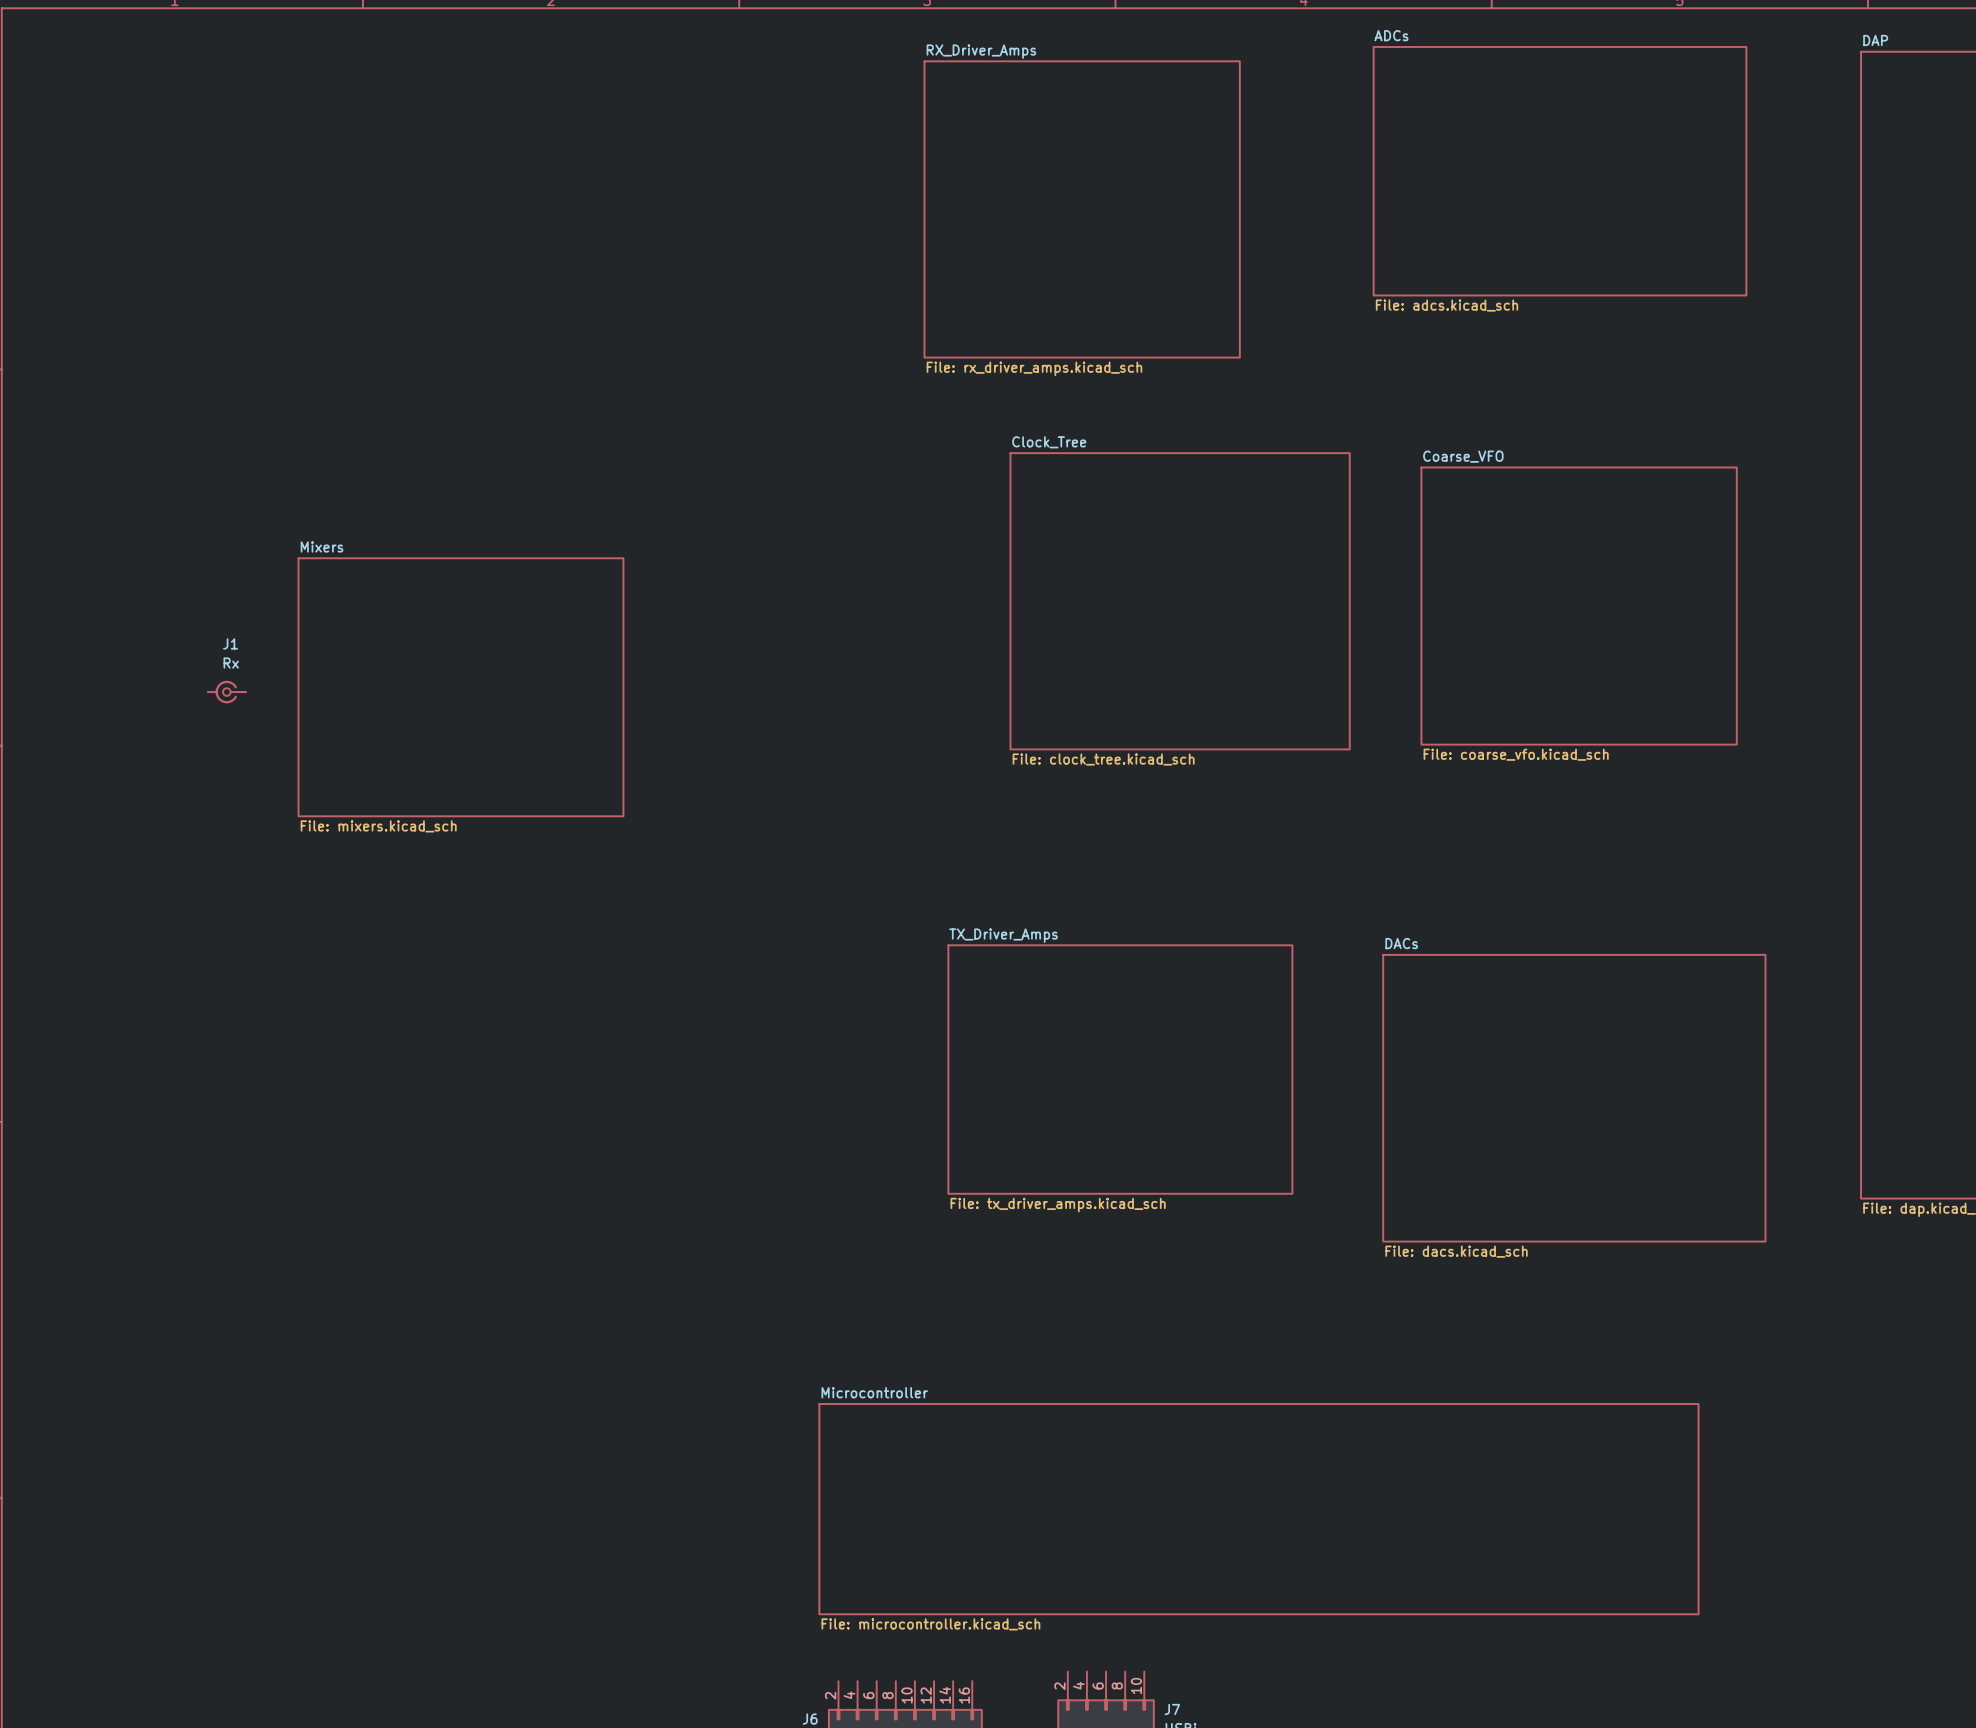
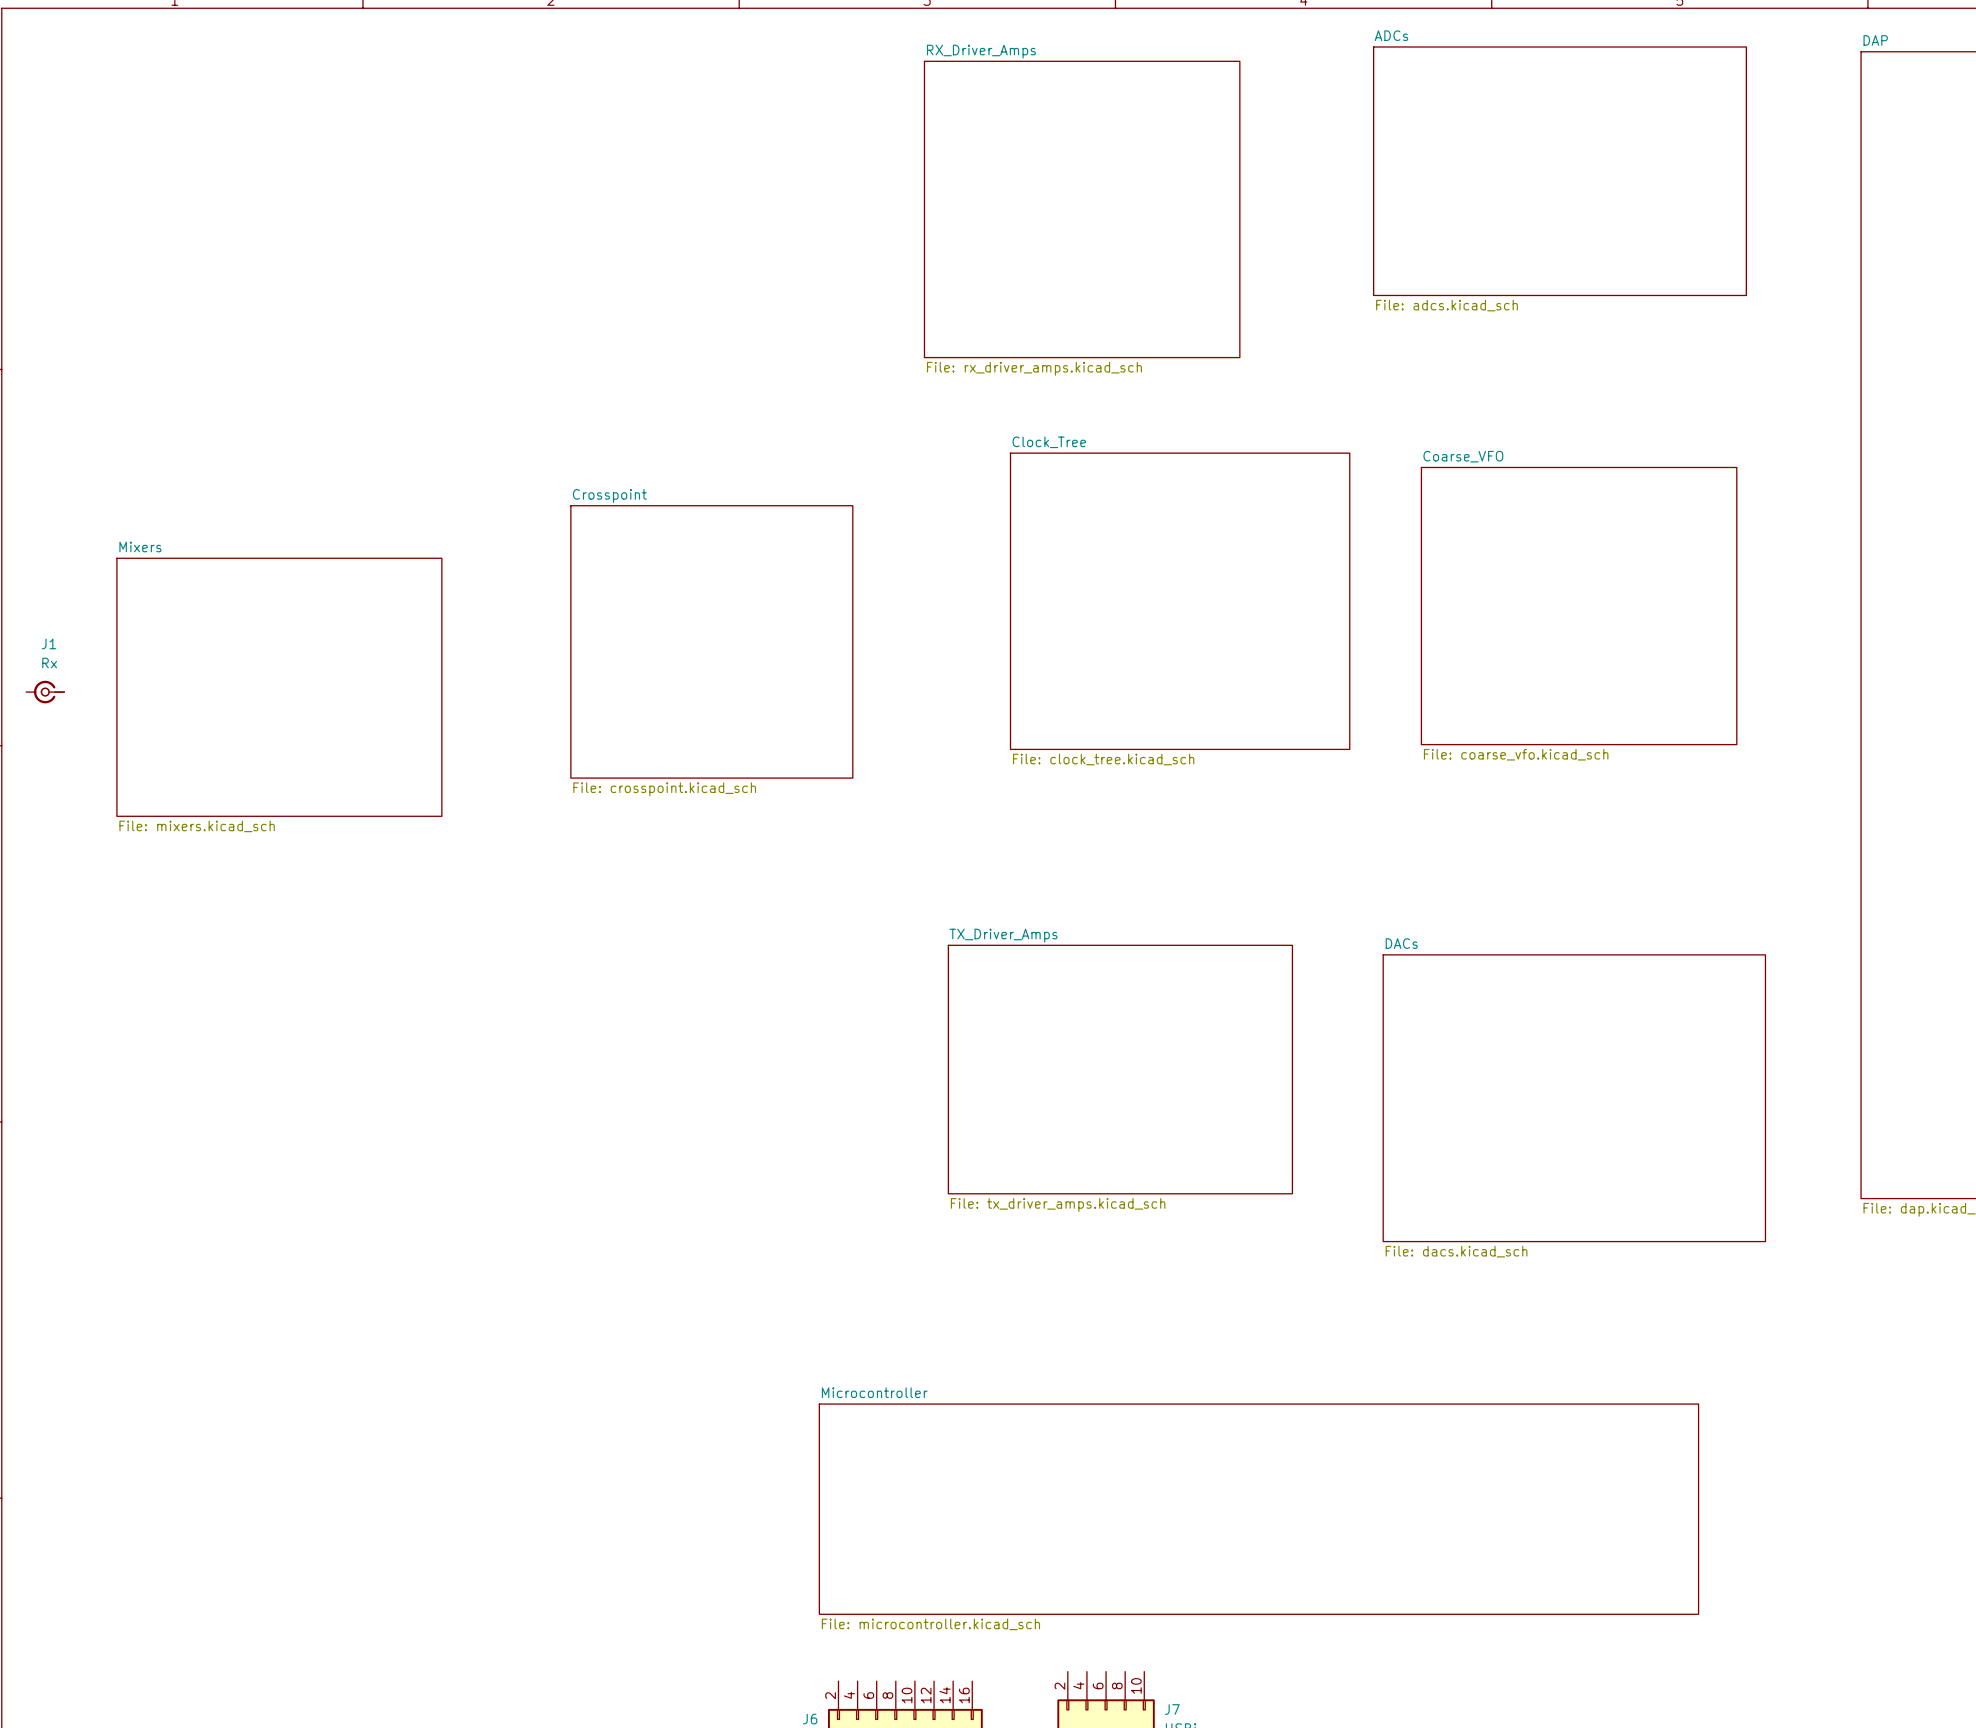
sheet Crosspoint: none -> File: crosspoint.kicad_sch (711, 641)
sheet Mixers position: (460, 687) -> (279, 687)
J1 position: (226, 692) -> (45, 692)

